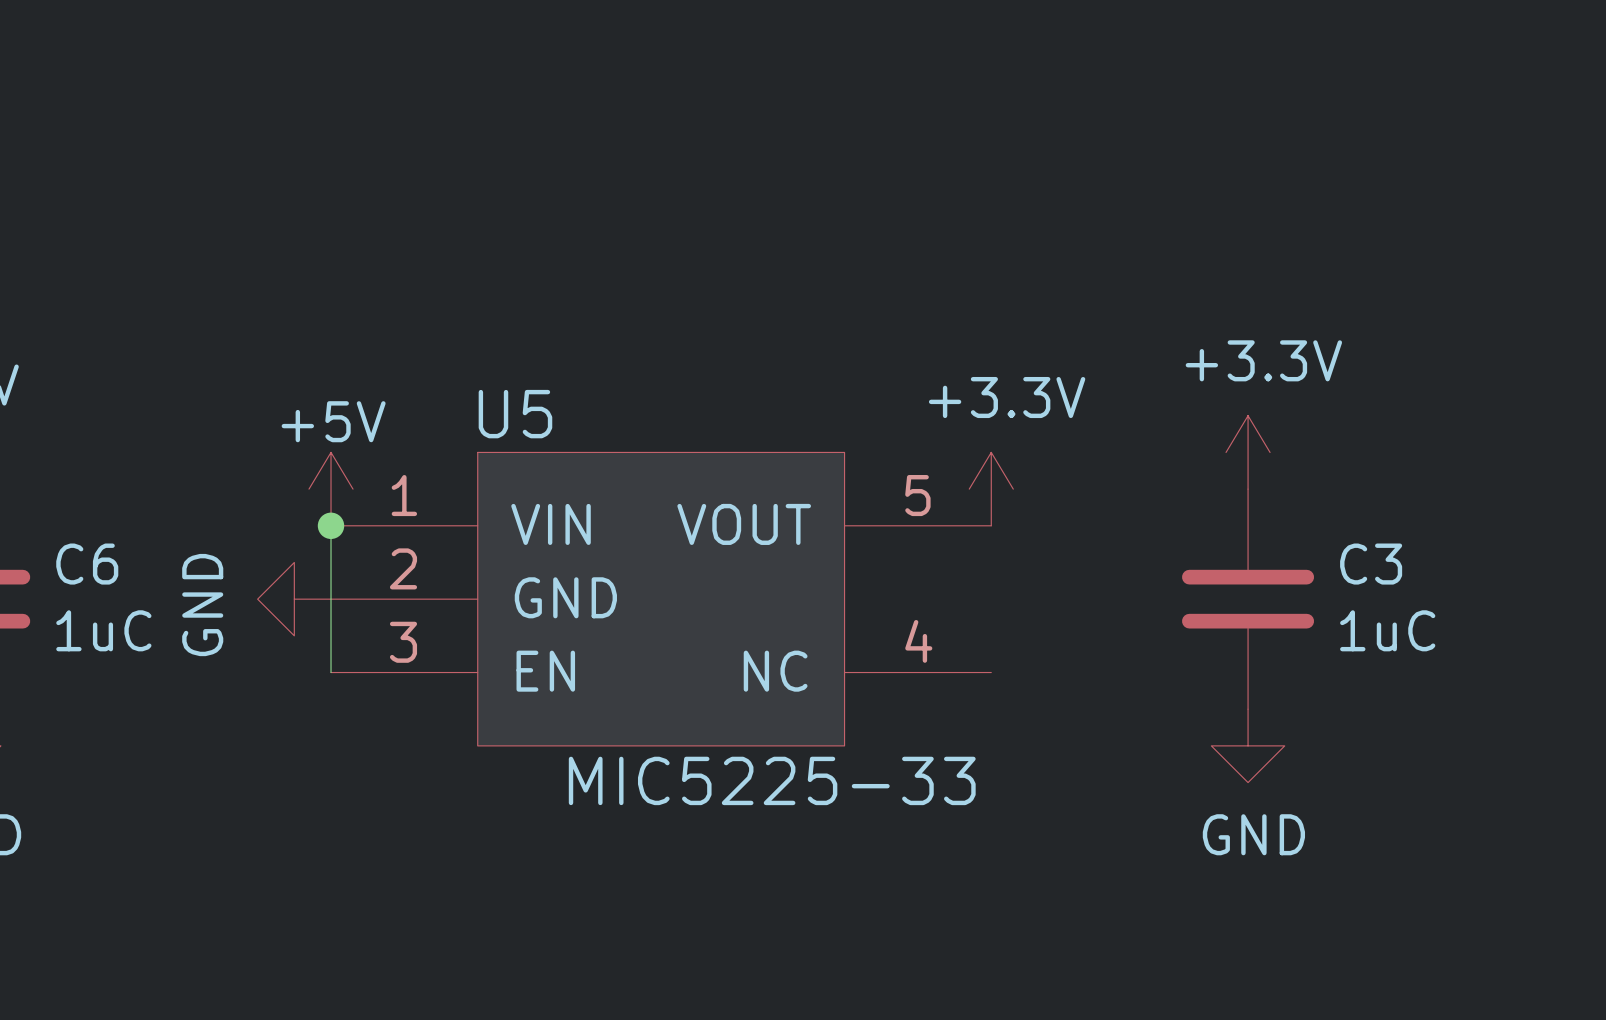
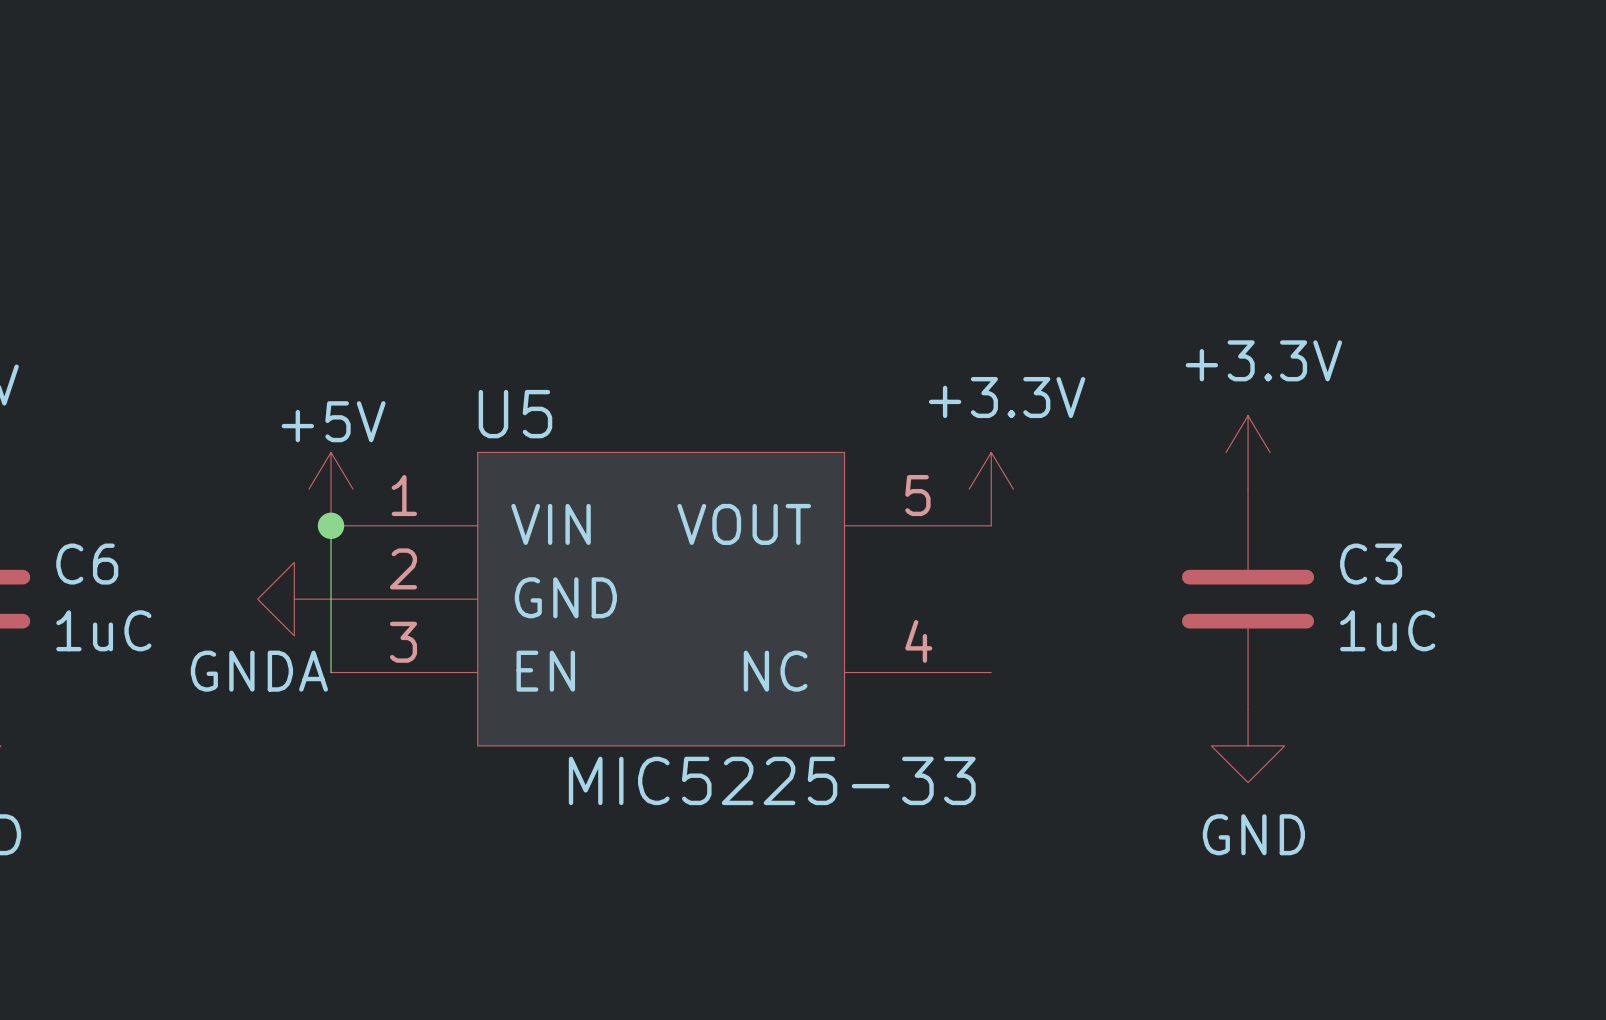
power symbol: GND (294, 599) -> GNDA (294, 599)

